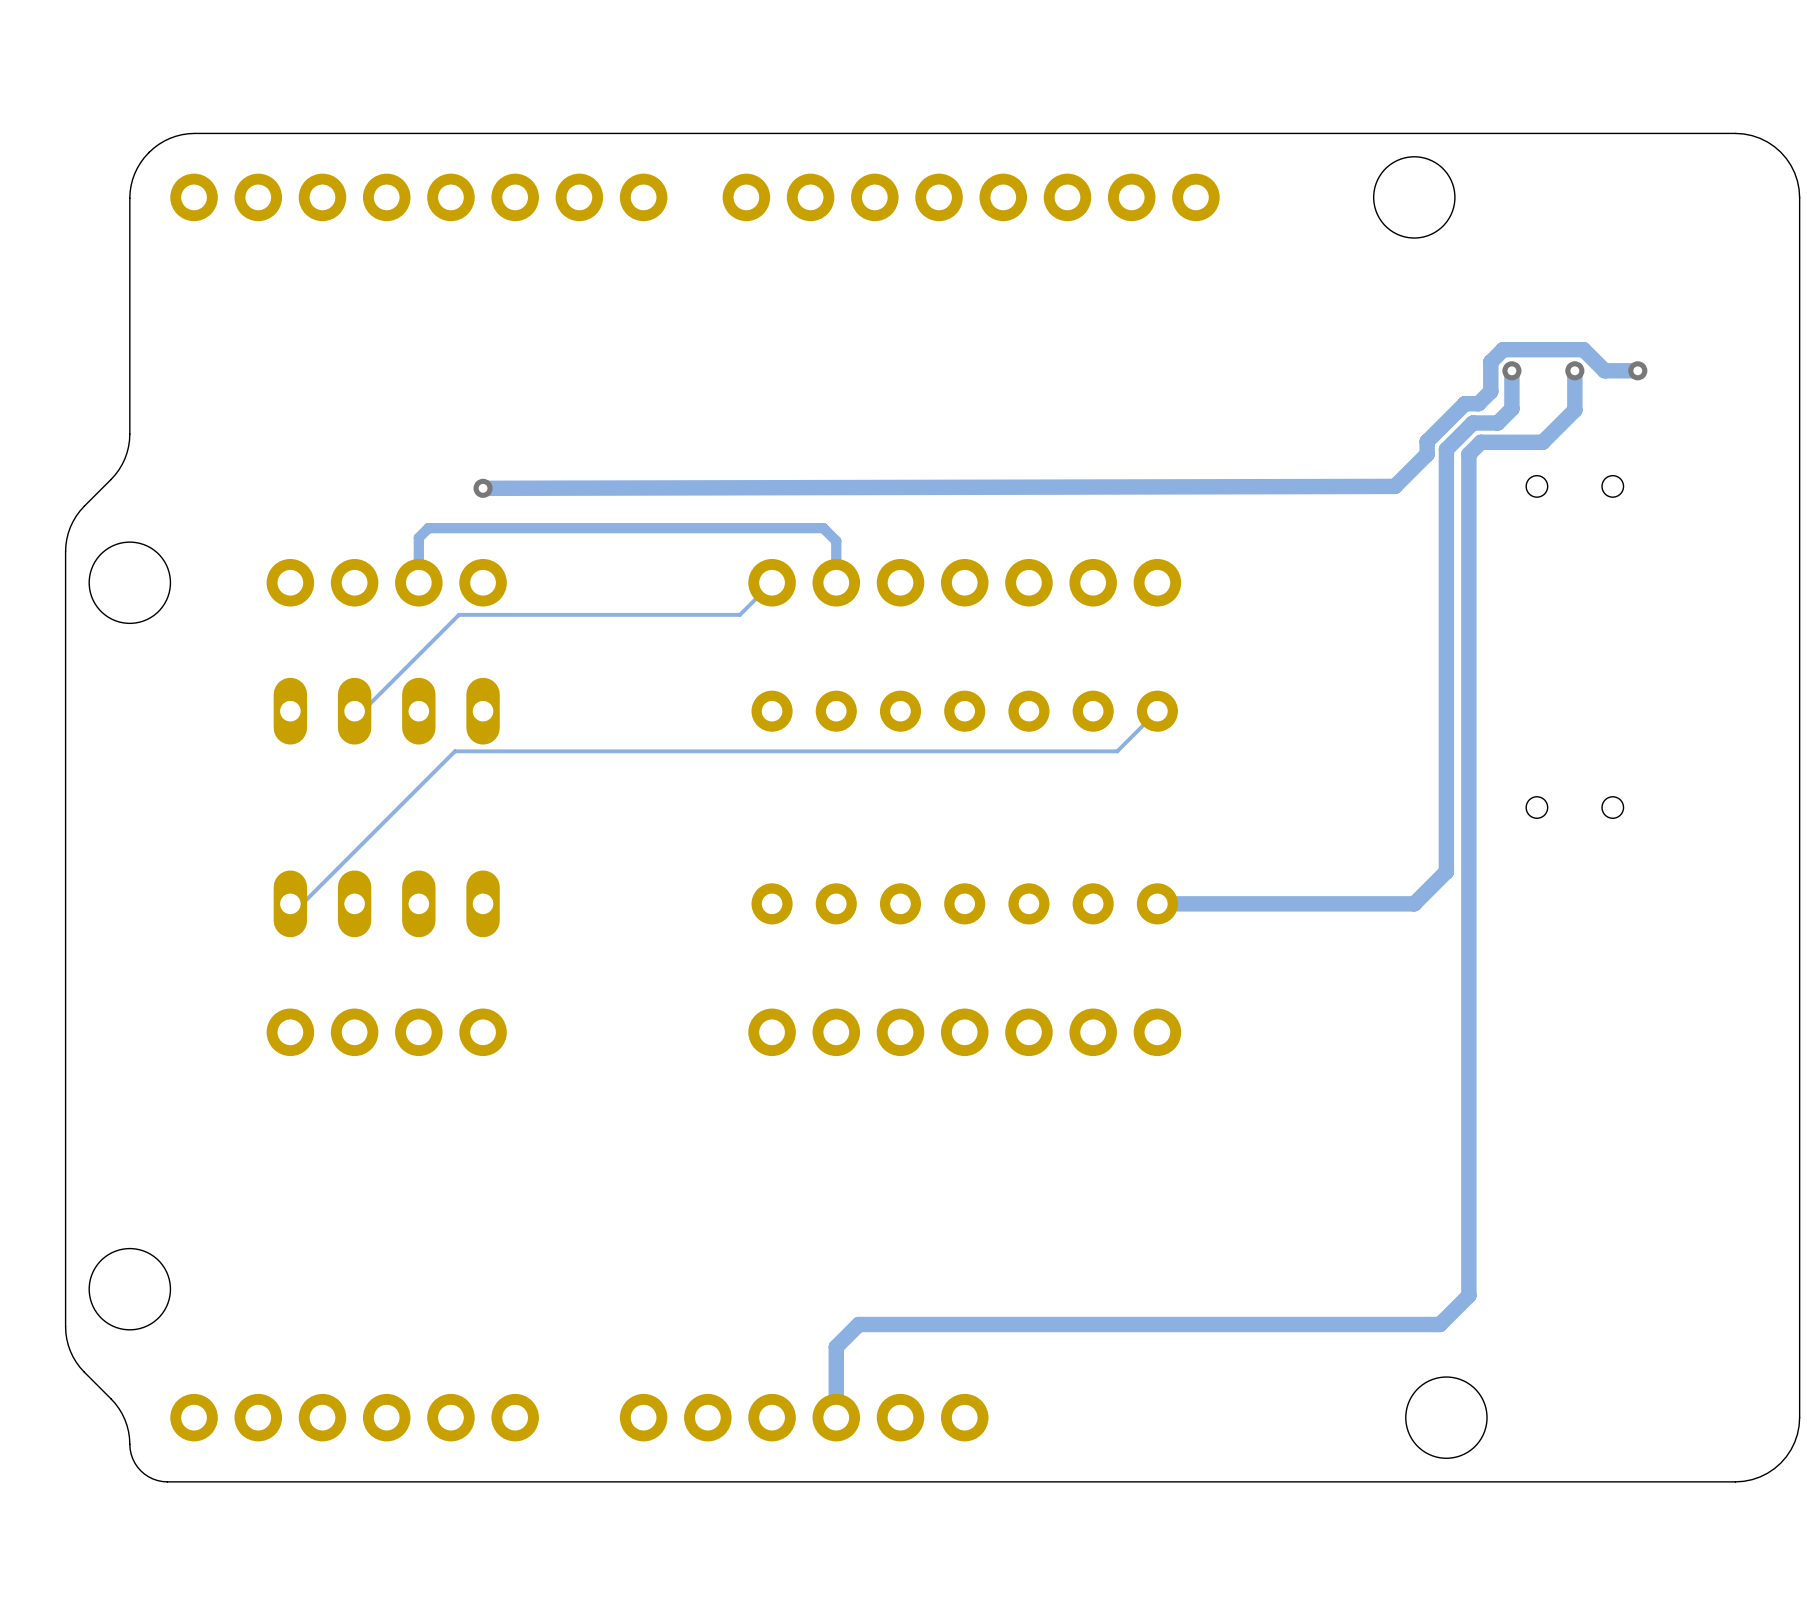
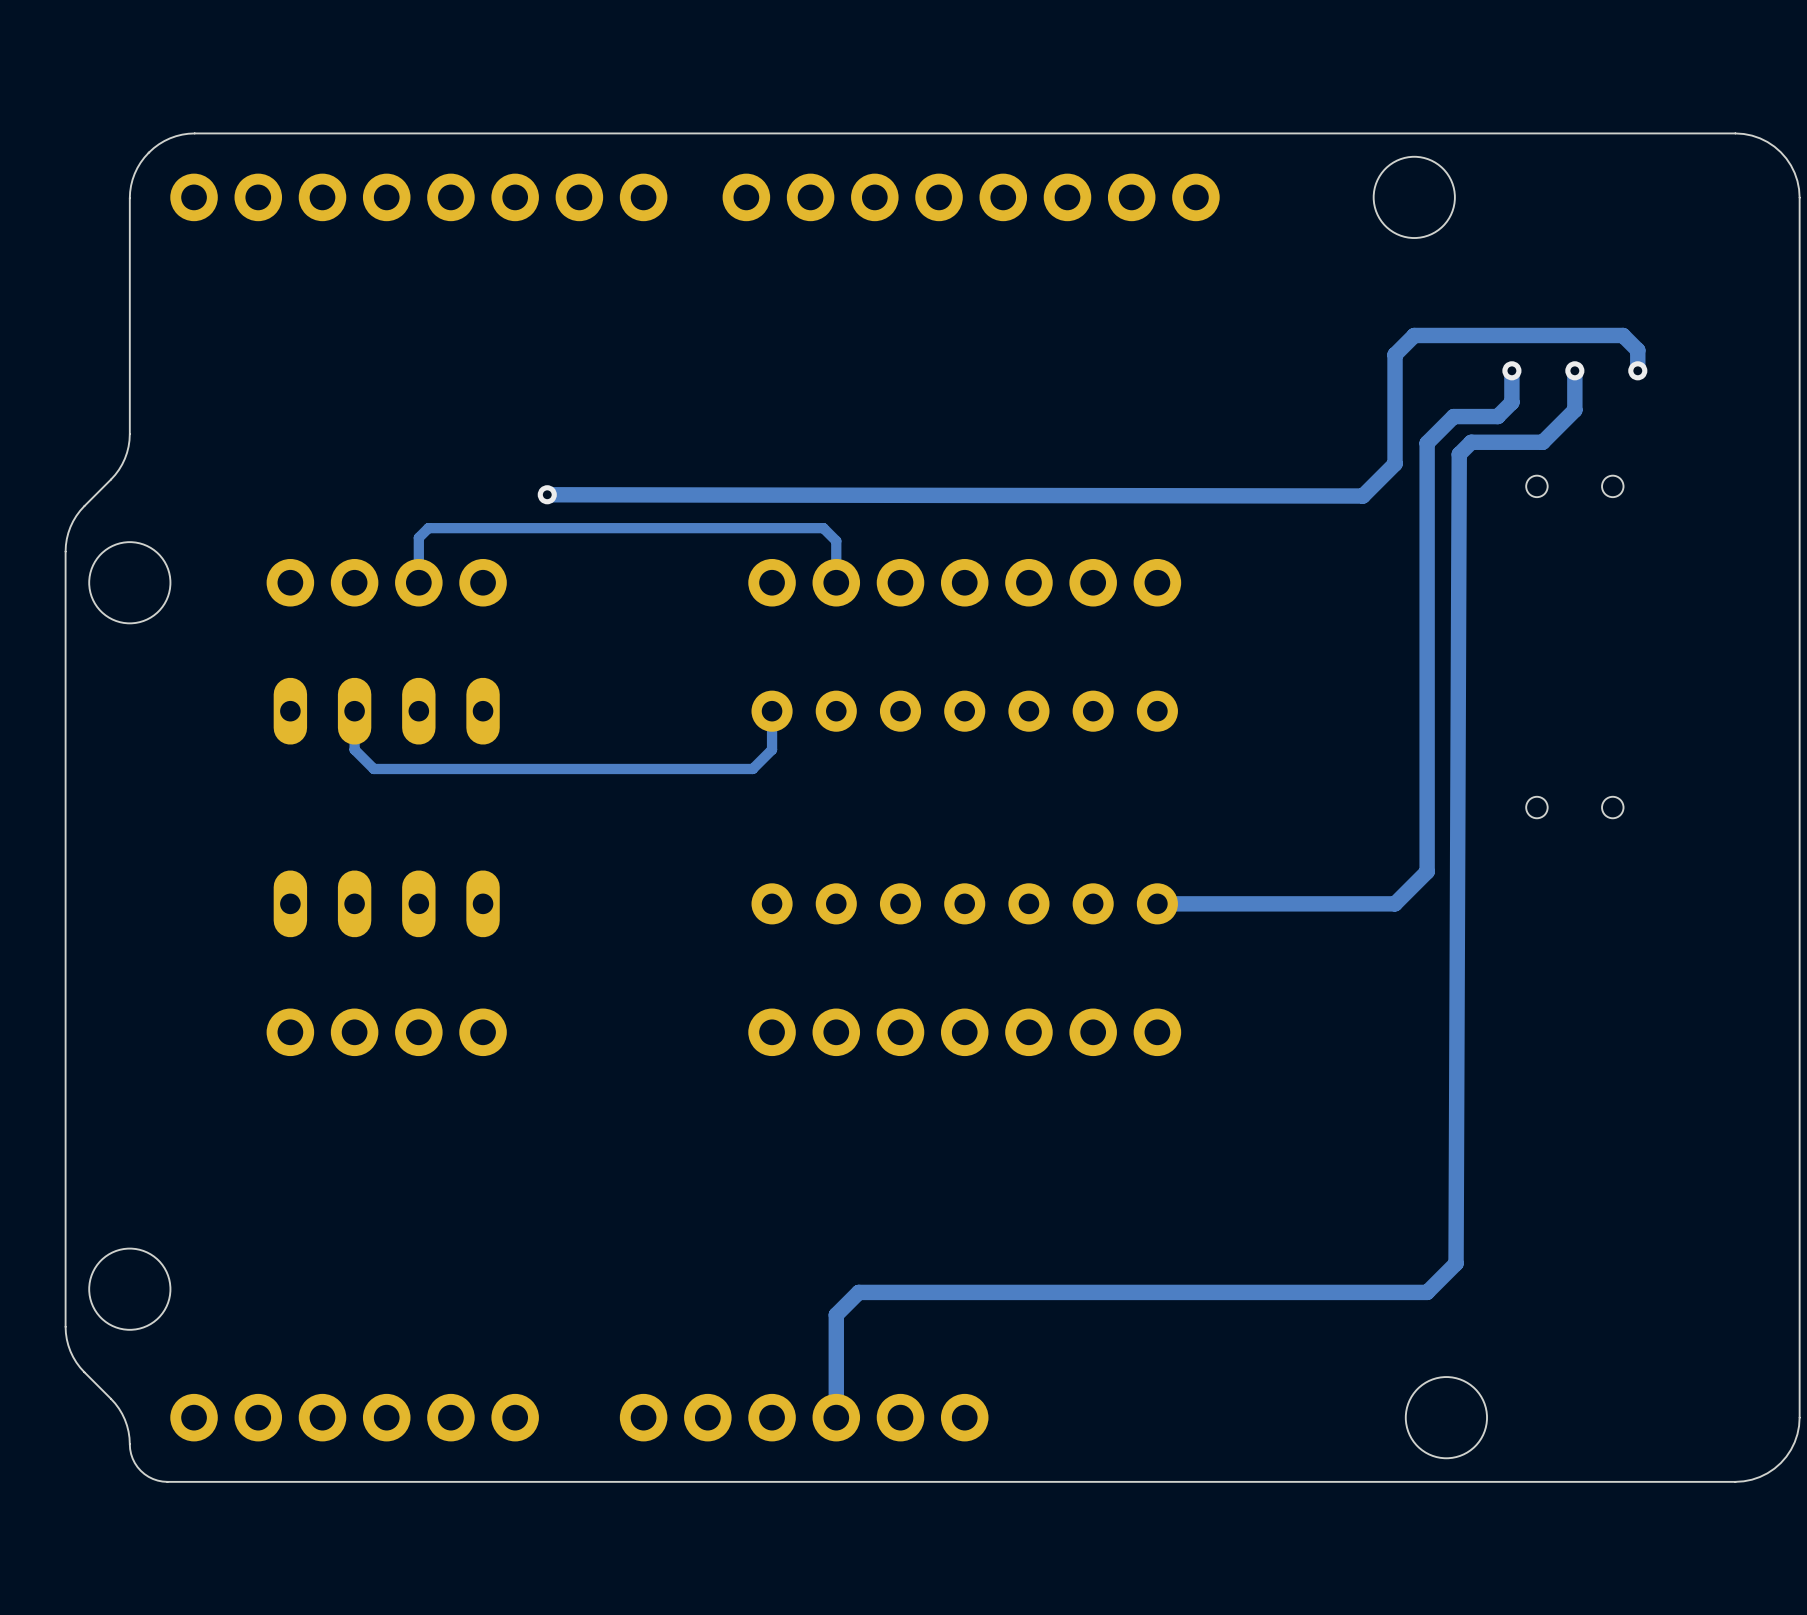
track: (1637, 370) (1604, 370) (1583, 349) (1503, 349) (1490, 362) (1490, 391) (1478, 403) (1464, 403) (1427, 443) -> (1511, 402) (1497, 416) (1453, 416) (1427, 443)
track: none -> (1637, 370) (1637, 350) (1623, 335) (1414, 335) (1395, 354) (1395, 463) (1362, 496) (547, 494)
track: (1511, 402) (1511, 408) (1497, 423) (1472, 423) (1446, 449) (1446, 871) (1414, 903) (1395, 903) -> (1427, 454) (1427, 871) (1395, 903)
track: (1480, 442) (1468, 454) (1468, 1295) (1439, 1324) (858, 1324) (836, 1347) -> (1480, 442) (1471, 442) (1459, 454) (1456, 1263) (1427, 1292) (858, 1292) (836, 1314) (836, 1347)
track: (1427, 454) (1395, 486) (483, 488) -> none
via position: (483, 488) -> (547, 494)
track: (772, 582) (739, 614) (458, 614) (362, 711) (354, 711) -> (772, 711) (772, 749) (752, 768) (373, 768) (354, 749) (354, 711)
track: (1157, 711) (1117, 751) (454, 751) (302, 903) (290, 903) -> none

